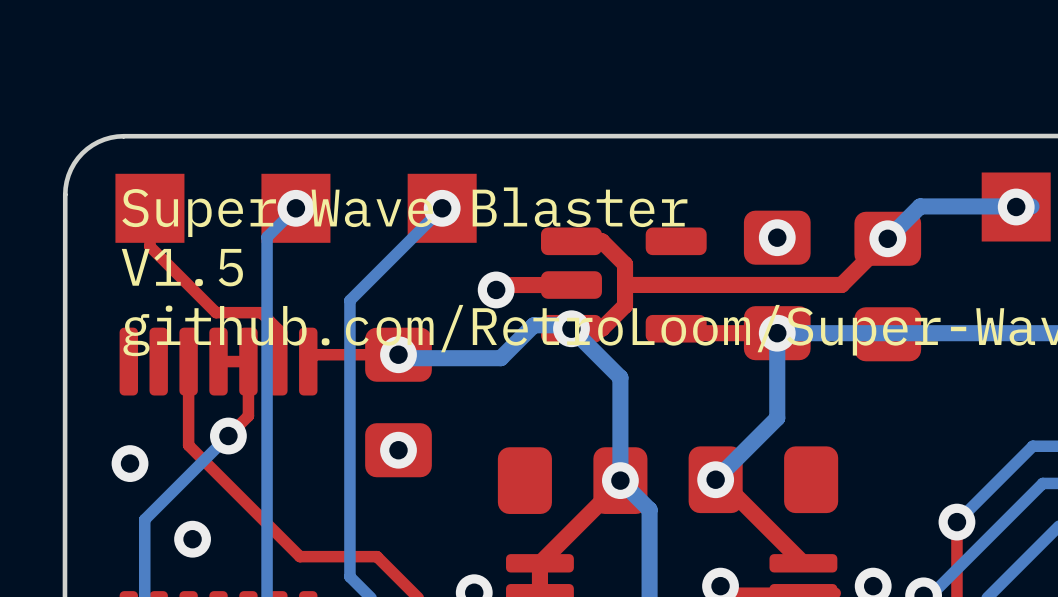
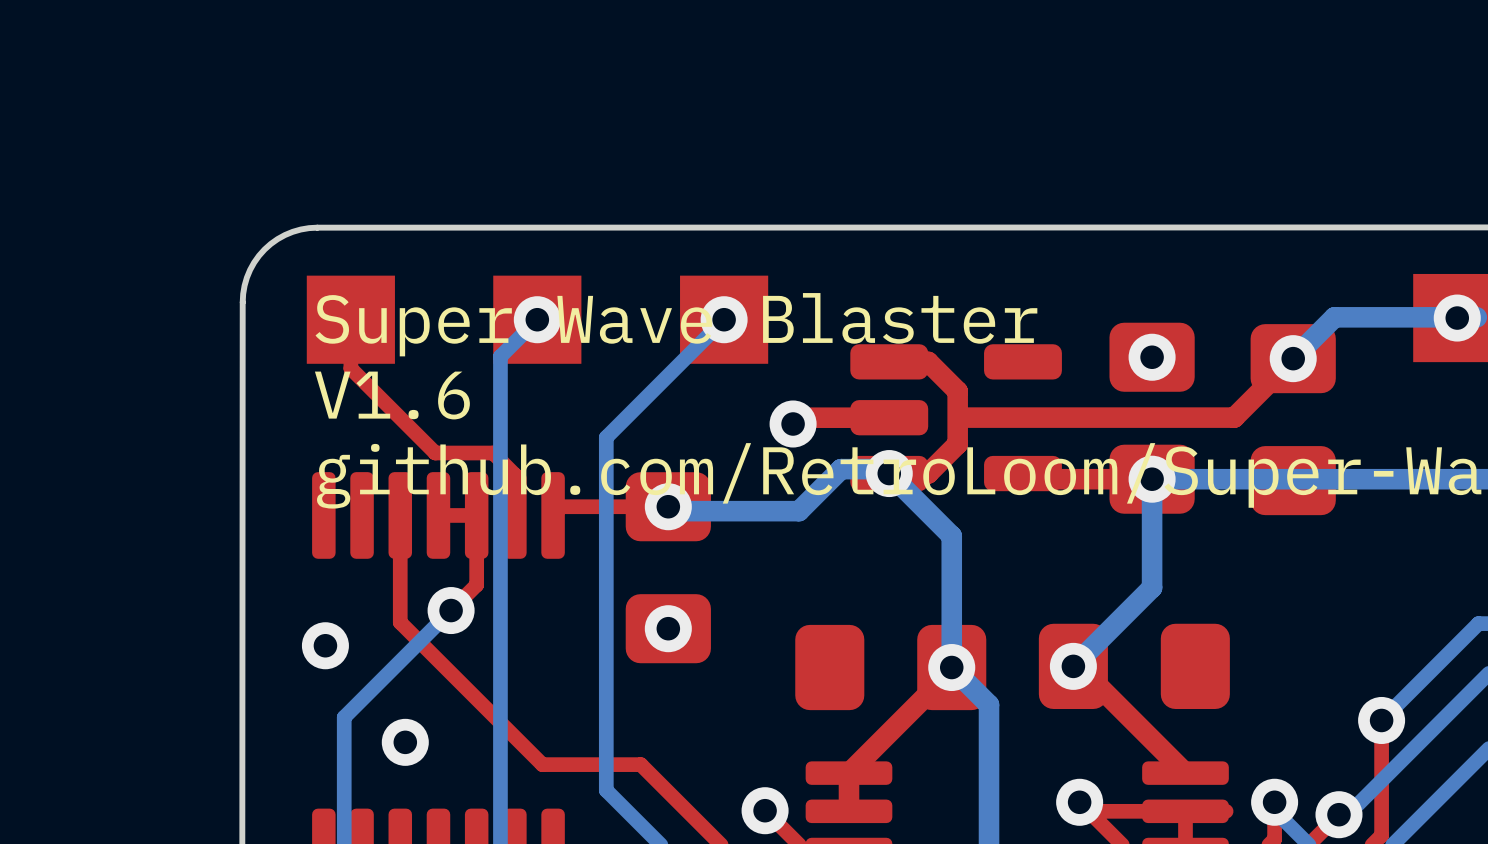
text: V1.5 (182, 267) -> V1.6 (392, 395)

